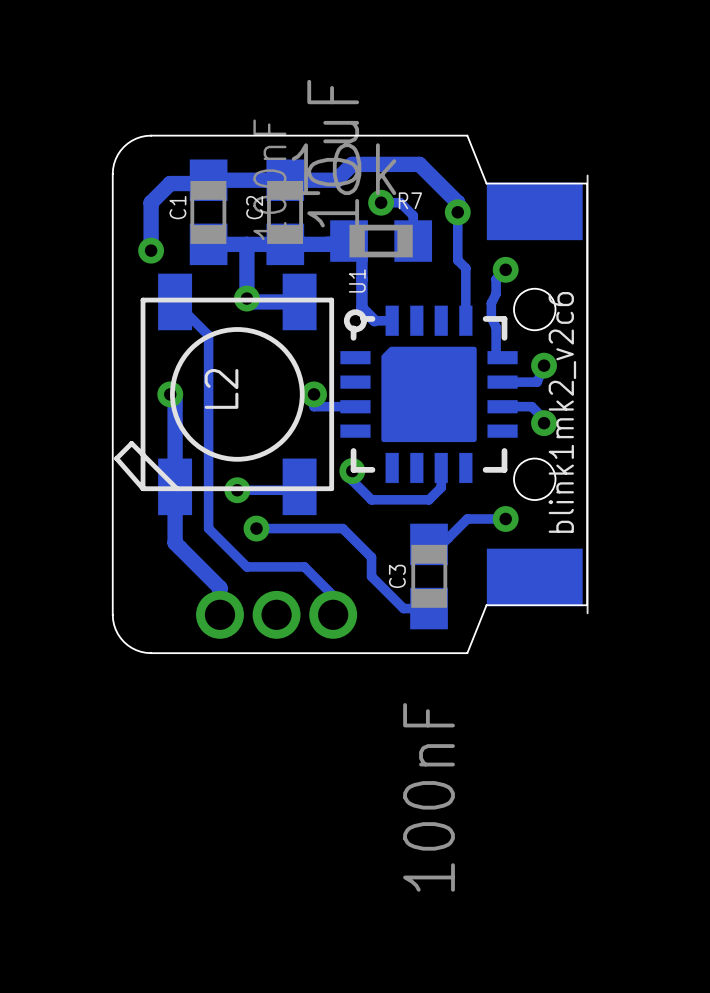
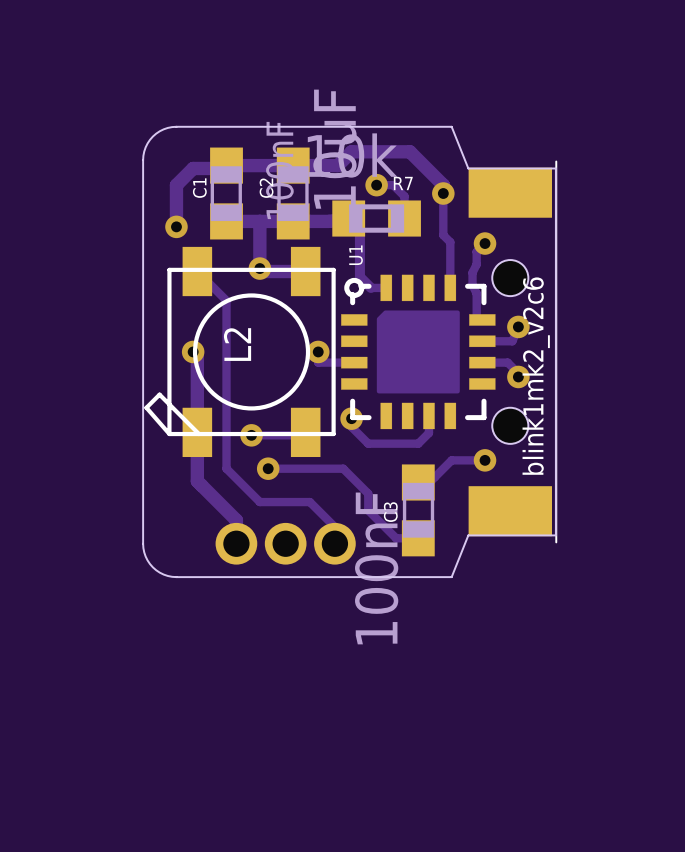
C3 value position: 100nF (429, 797) -> 100nF (376, 568)

